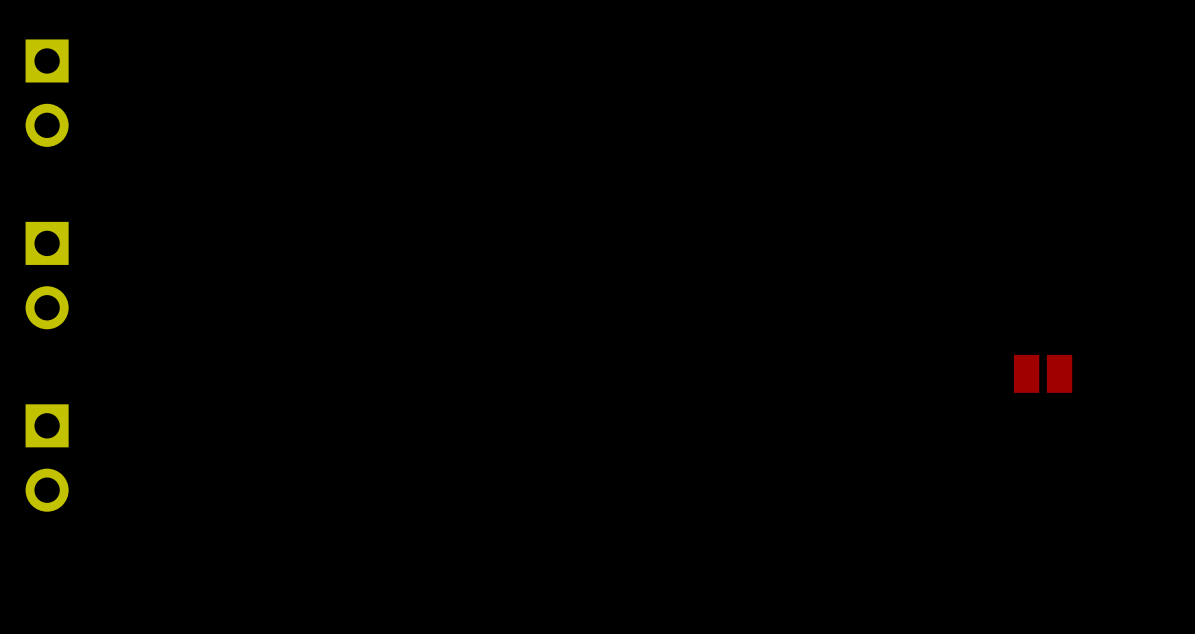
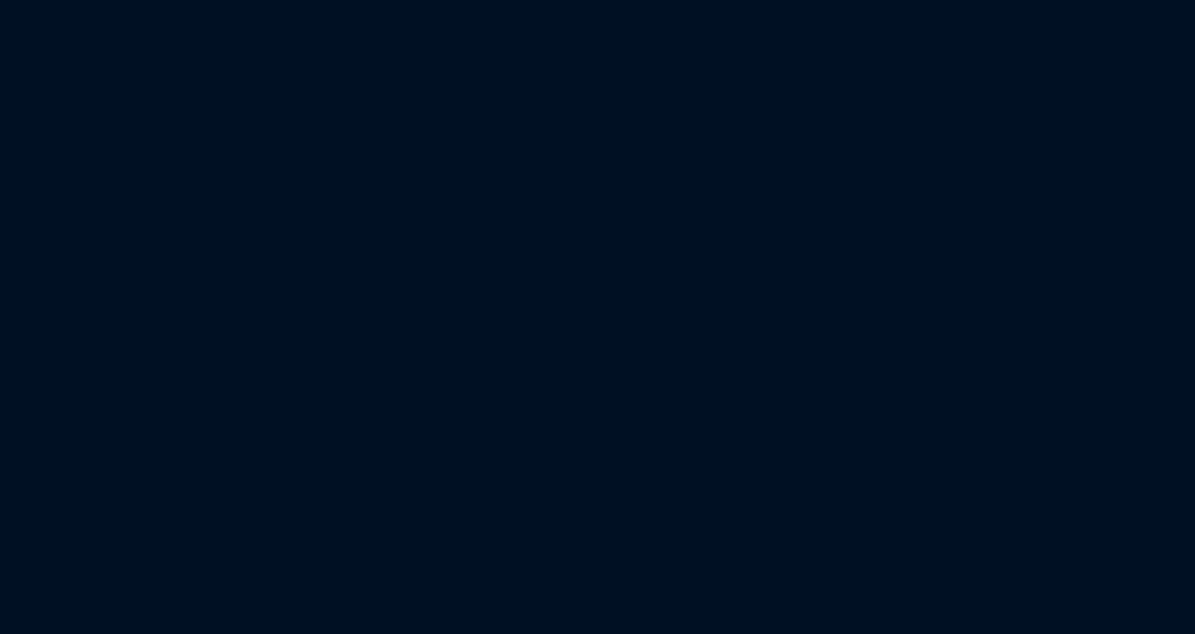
part: (47, 93) -> none
part: (47, 275) -> none
part: (1043, 373) -> none
part: (47, 458) -> none

